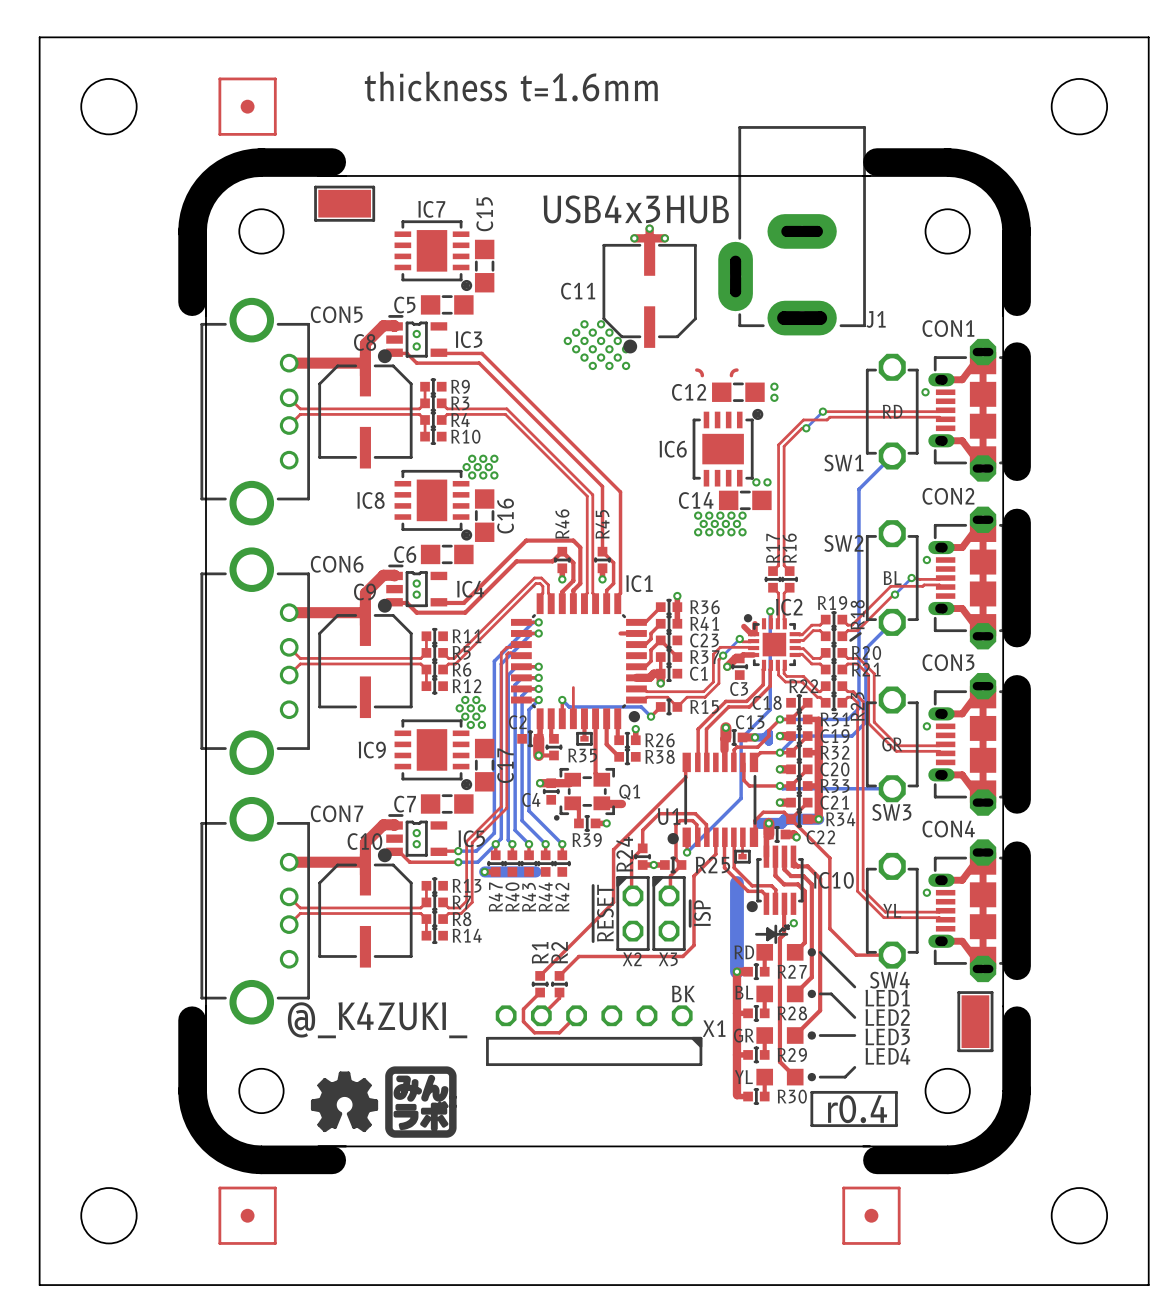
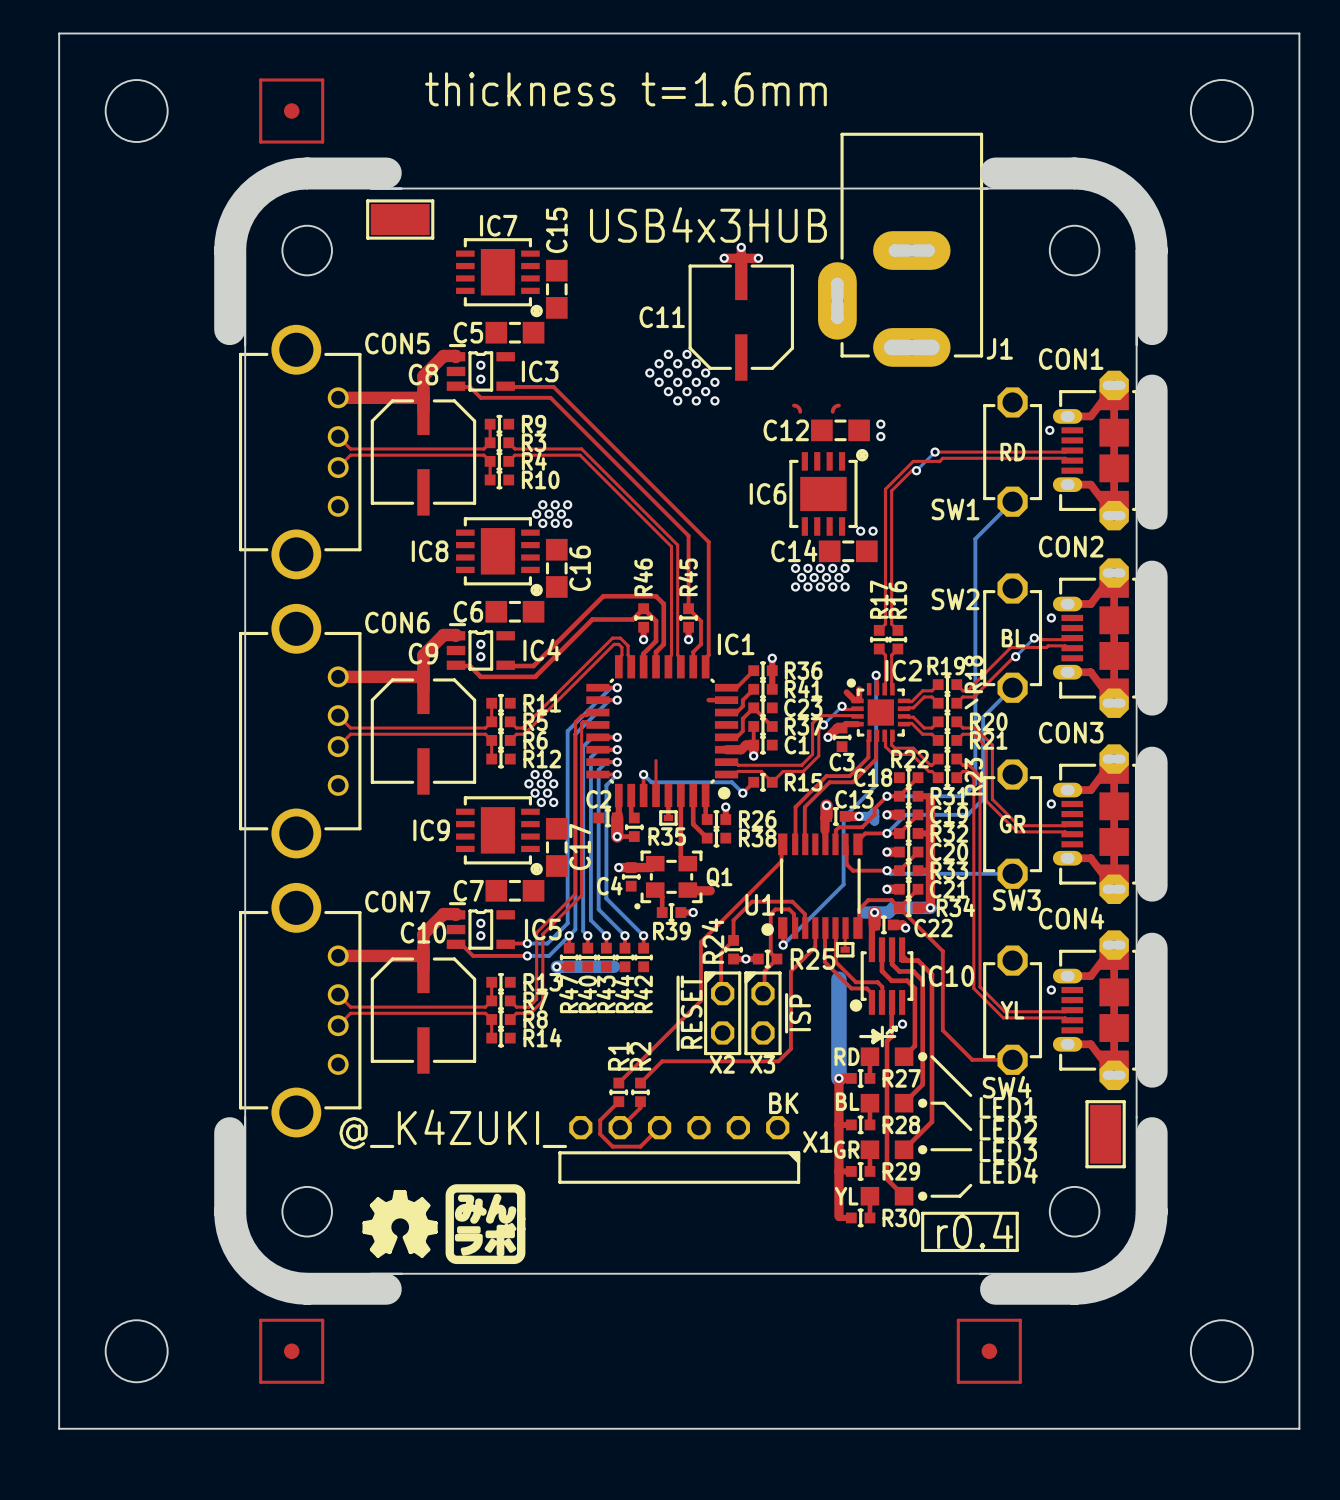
C11 footprint: [602, 234, 697, 354] -> [688, 253, 794, 381]
C8 footprint: [318, 349, 413, 469] -> [370, 388, 477, 516]
C9 footprint: [318, 598, 413, 719] -> [370, 667, 477, 795]
C10 footprint: [318, 848, 413, 968] -> [370, 946, 477, 1074]

